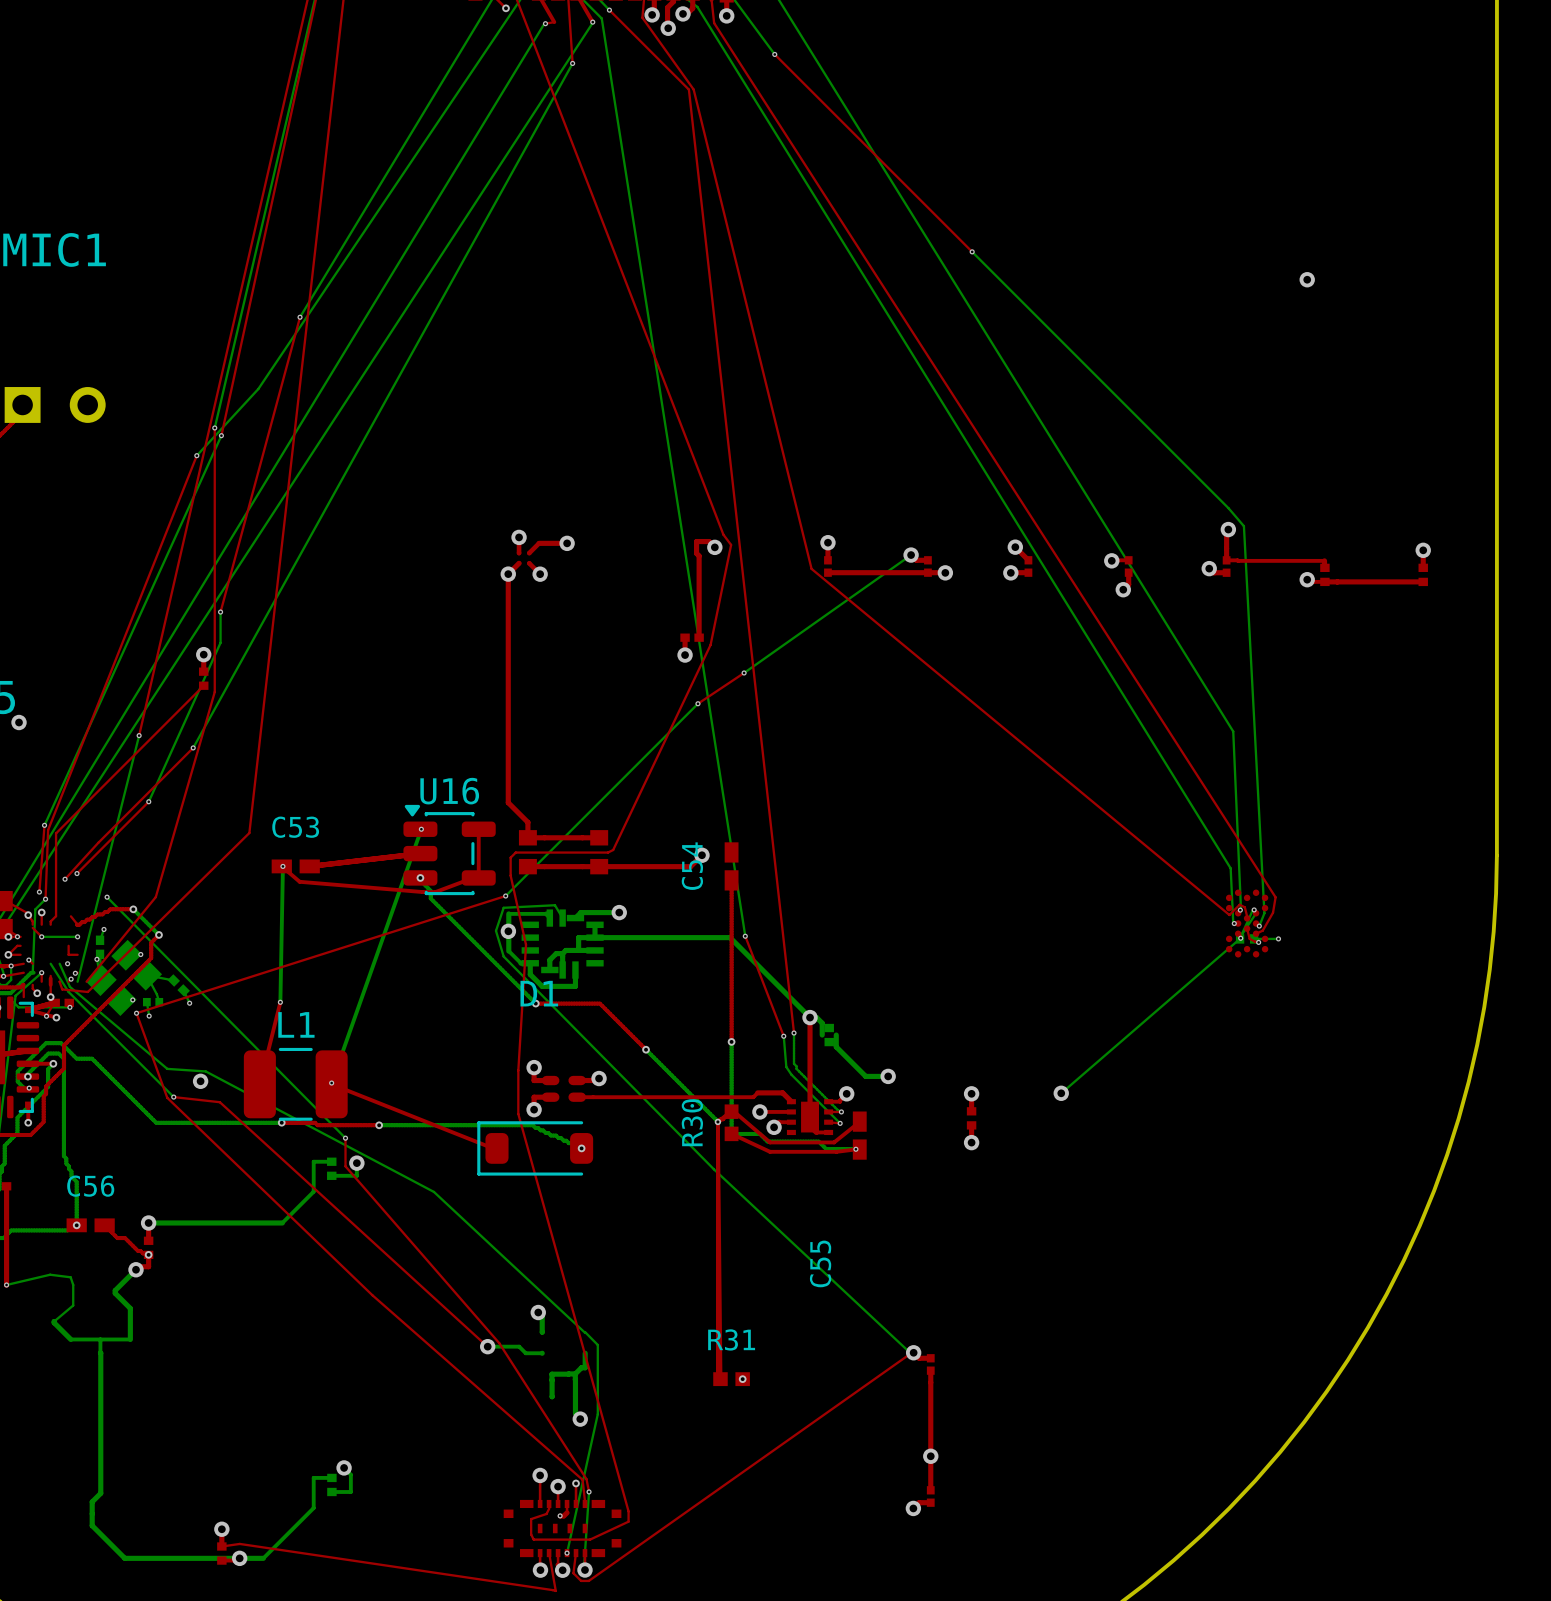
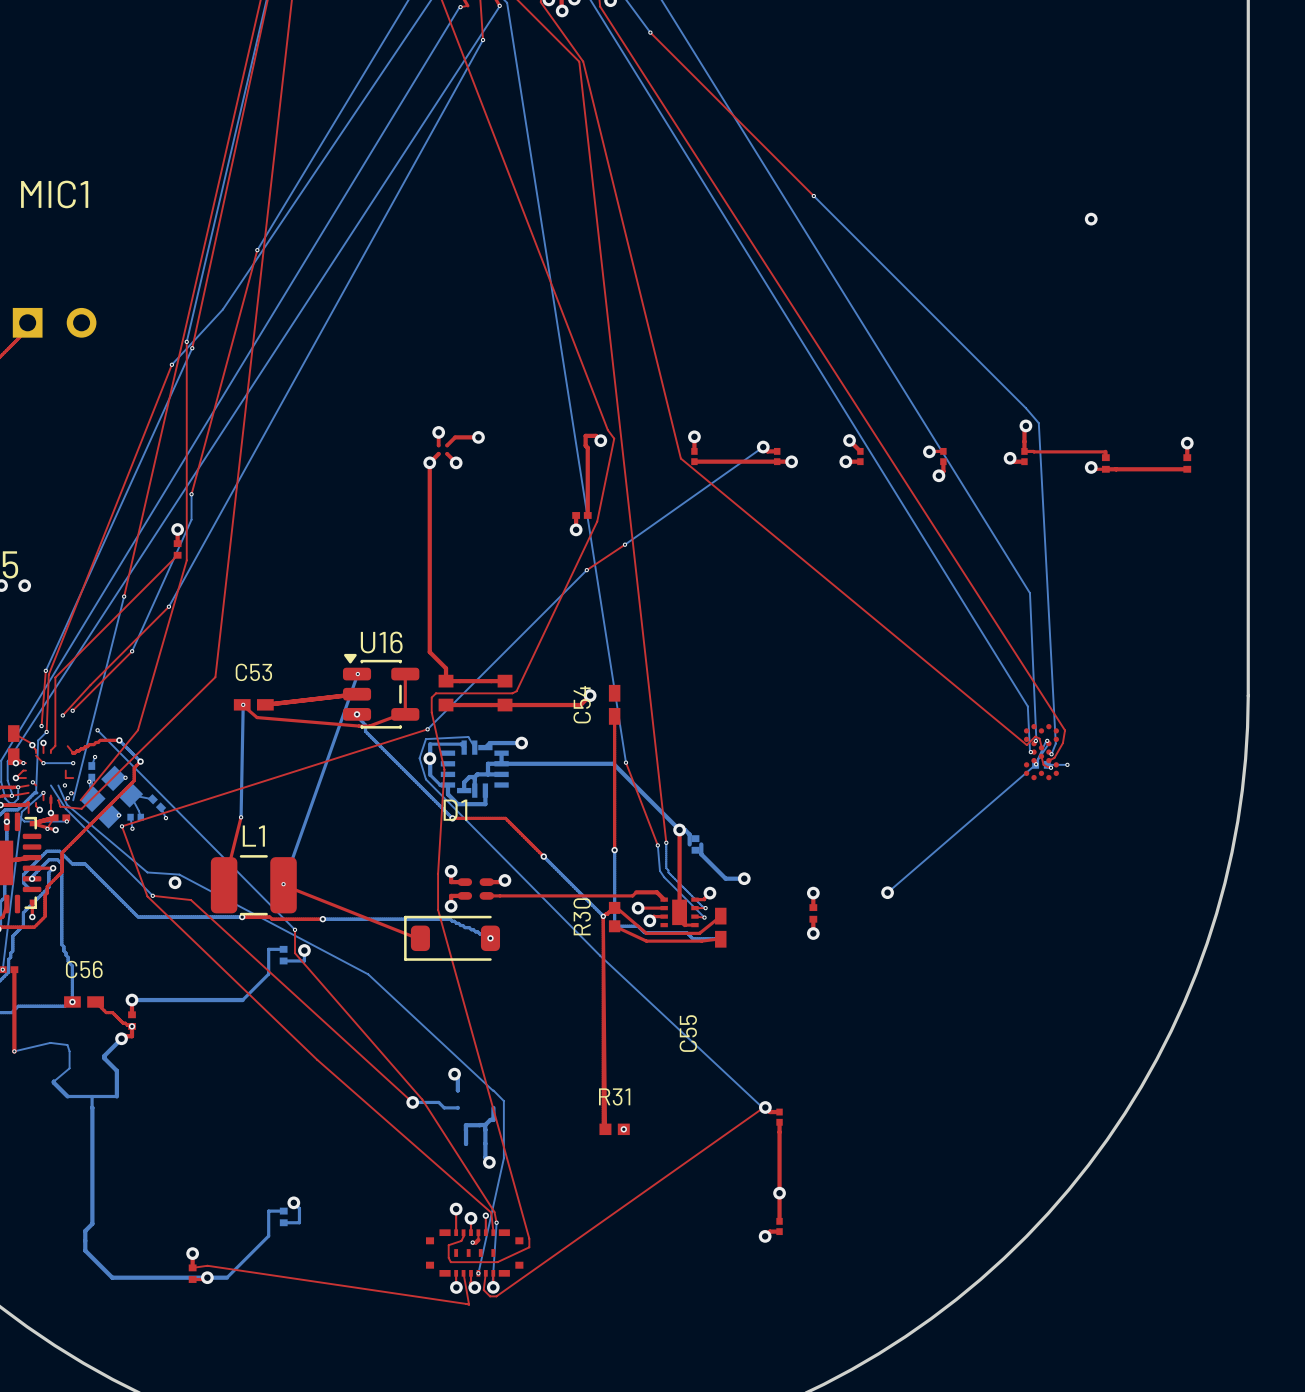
via: (29, 1088) -> none
via: (855, 1149) -> none

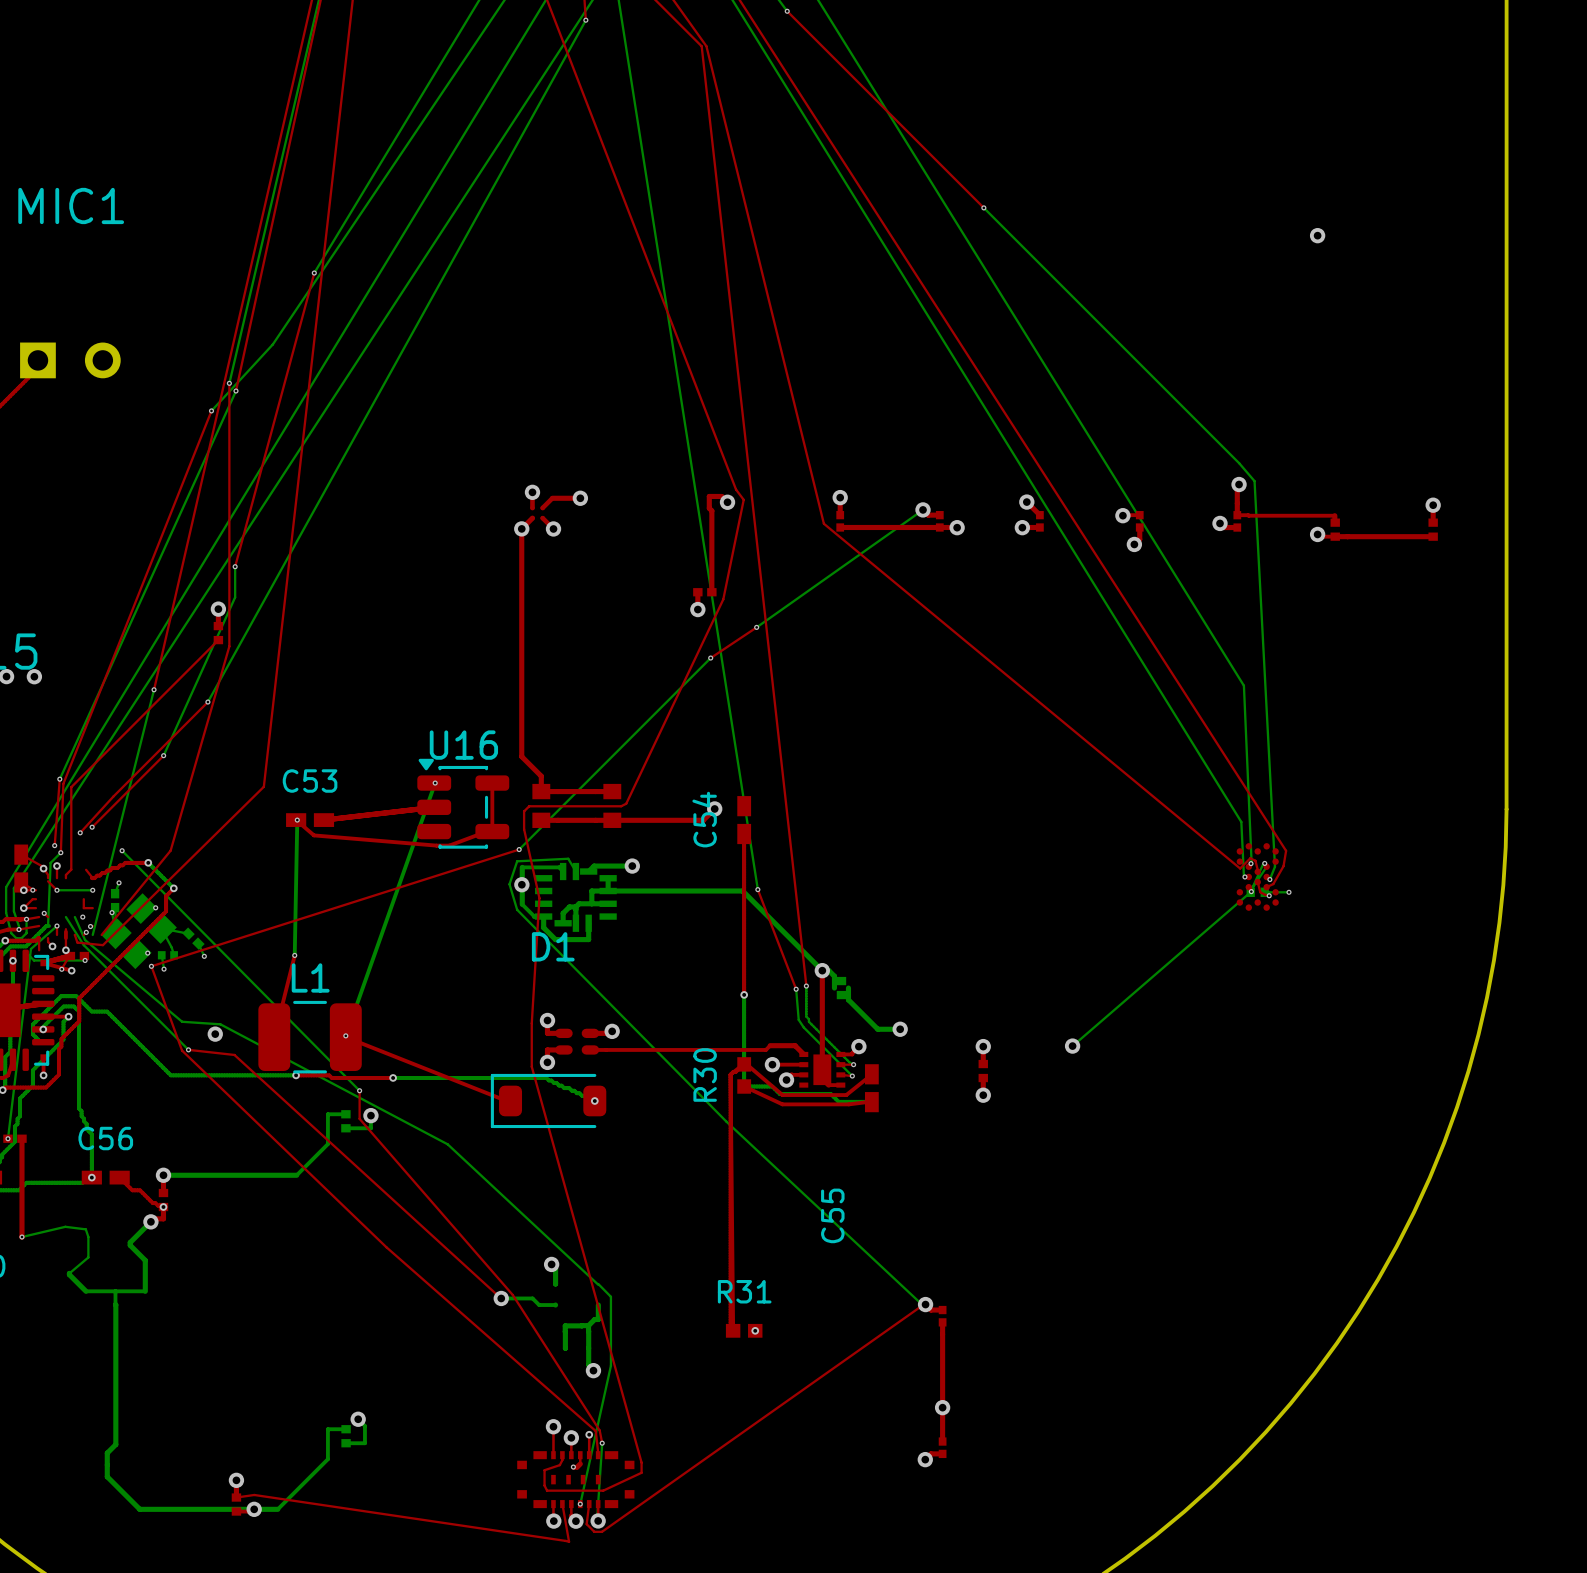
bottom track: (357, 714) (365, 725) (365, 731) (452, 818) -> none
via: (357, 714) -> none
top track: (452, 818) (505, 818) (543, 856) -> none
via: (452, 818) -> none
bottom track: (543, 856) (603, 916) -> none
via: (543, 856) -> none
via: (603, 916) -> none

